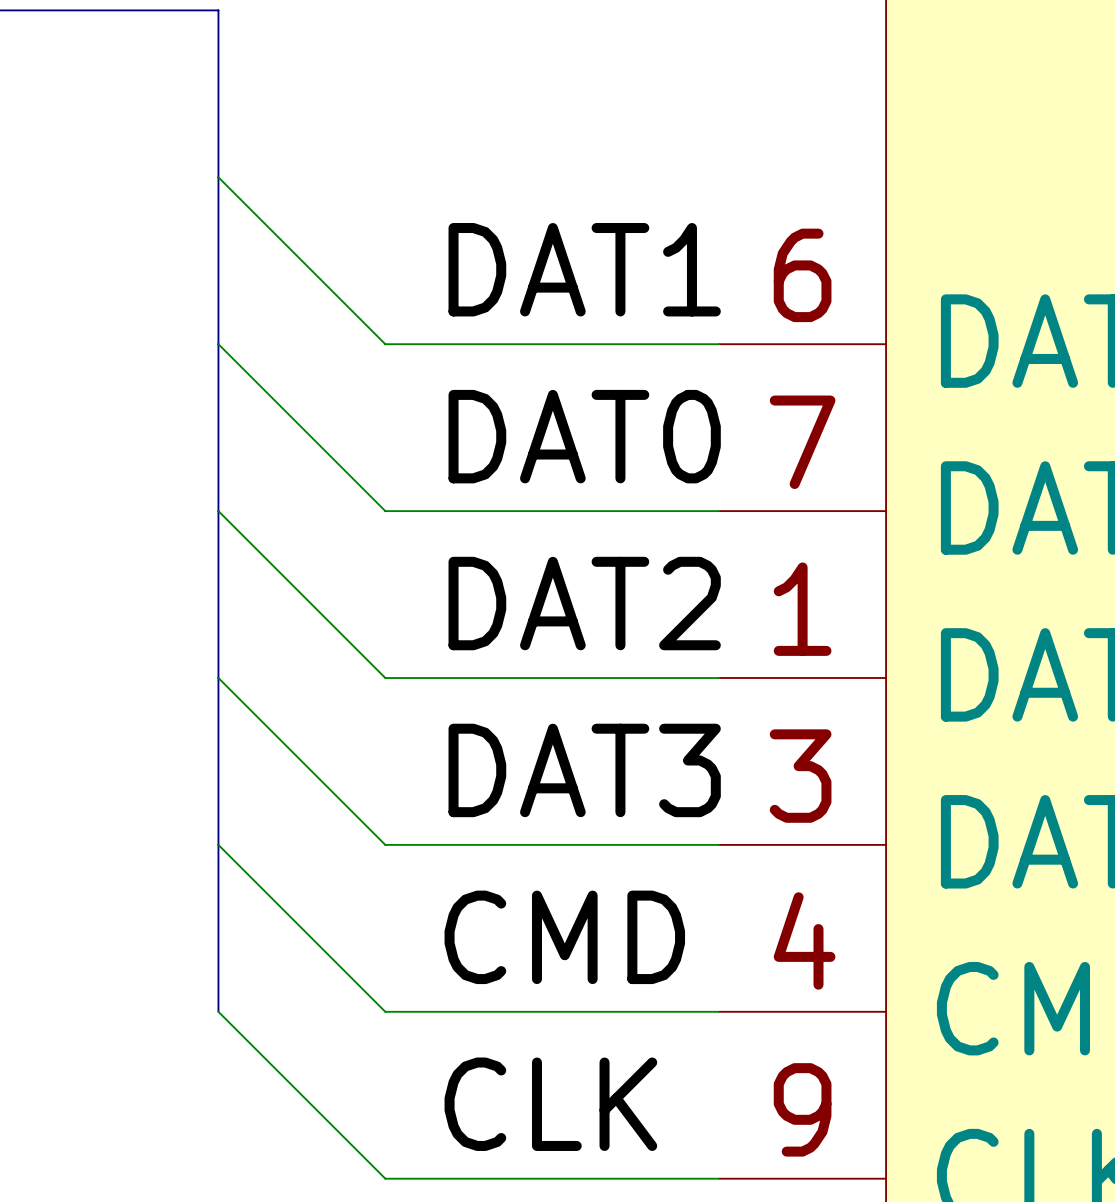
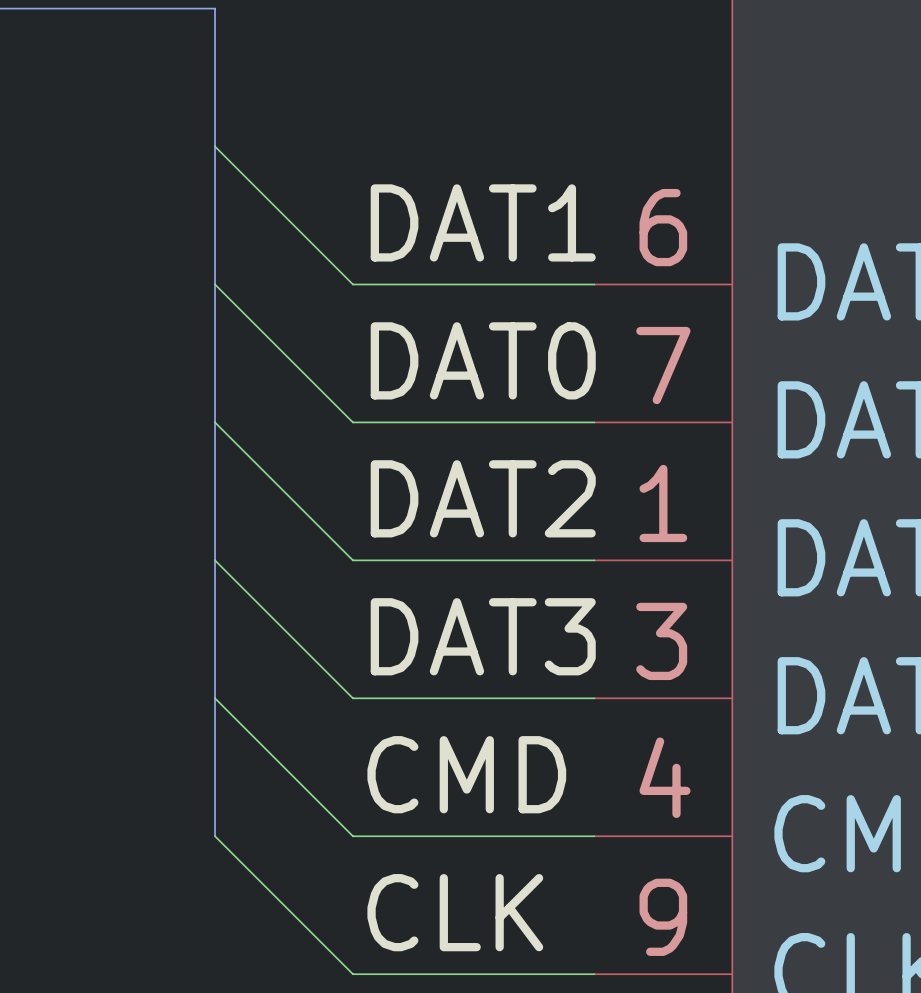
bus: (218, 10) (218, 1011) -> (180, 8) (215, 8) (215, 836)
wire: (218, 177) (385, 344) (427, 344) -> (215, 146) (352, 284)
wire: (218, 344) (385, 511) (427, 511) -> (215, 284) (352, 422)
wire: (218, 511) (385, 678) (427, 678) -> (215, 422) (352, 560)
wire: (218, 678) (385, 844) (427, 844) -> (215, 560) (352, 698)
wire: (218, 844) (385, 1011) (427, 1011) -> (215, 698) (352, 836)
wire: (218, 1011) (385, 1178) (427, 1178) -> (215, 836) (352, 974)

